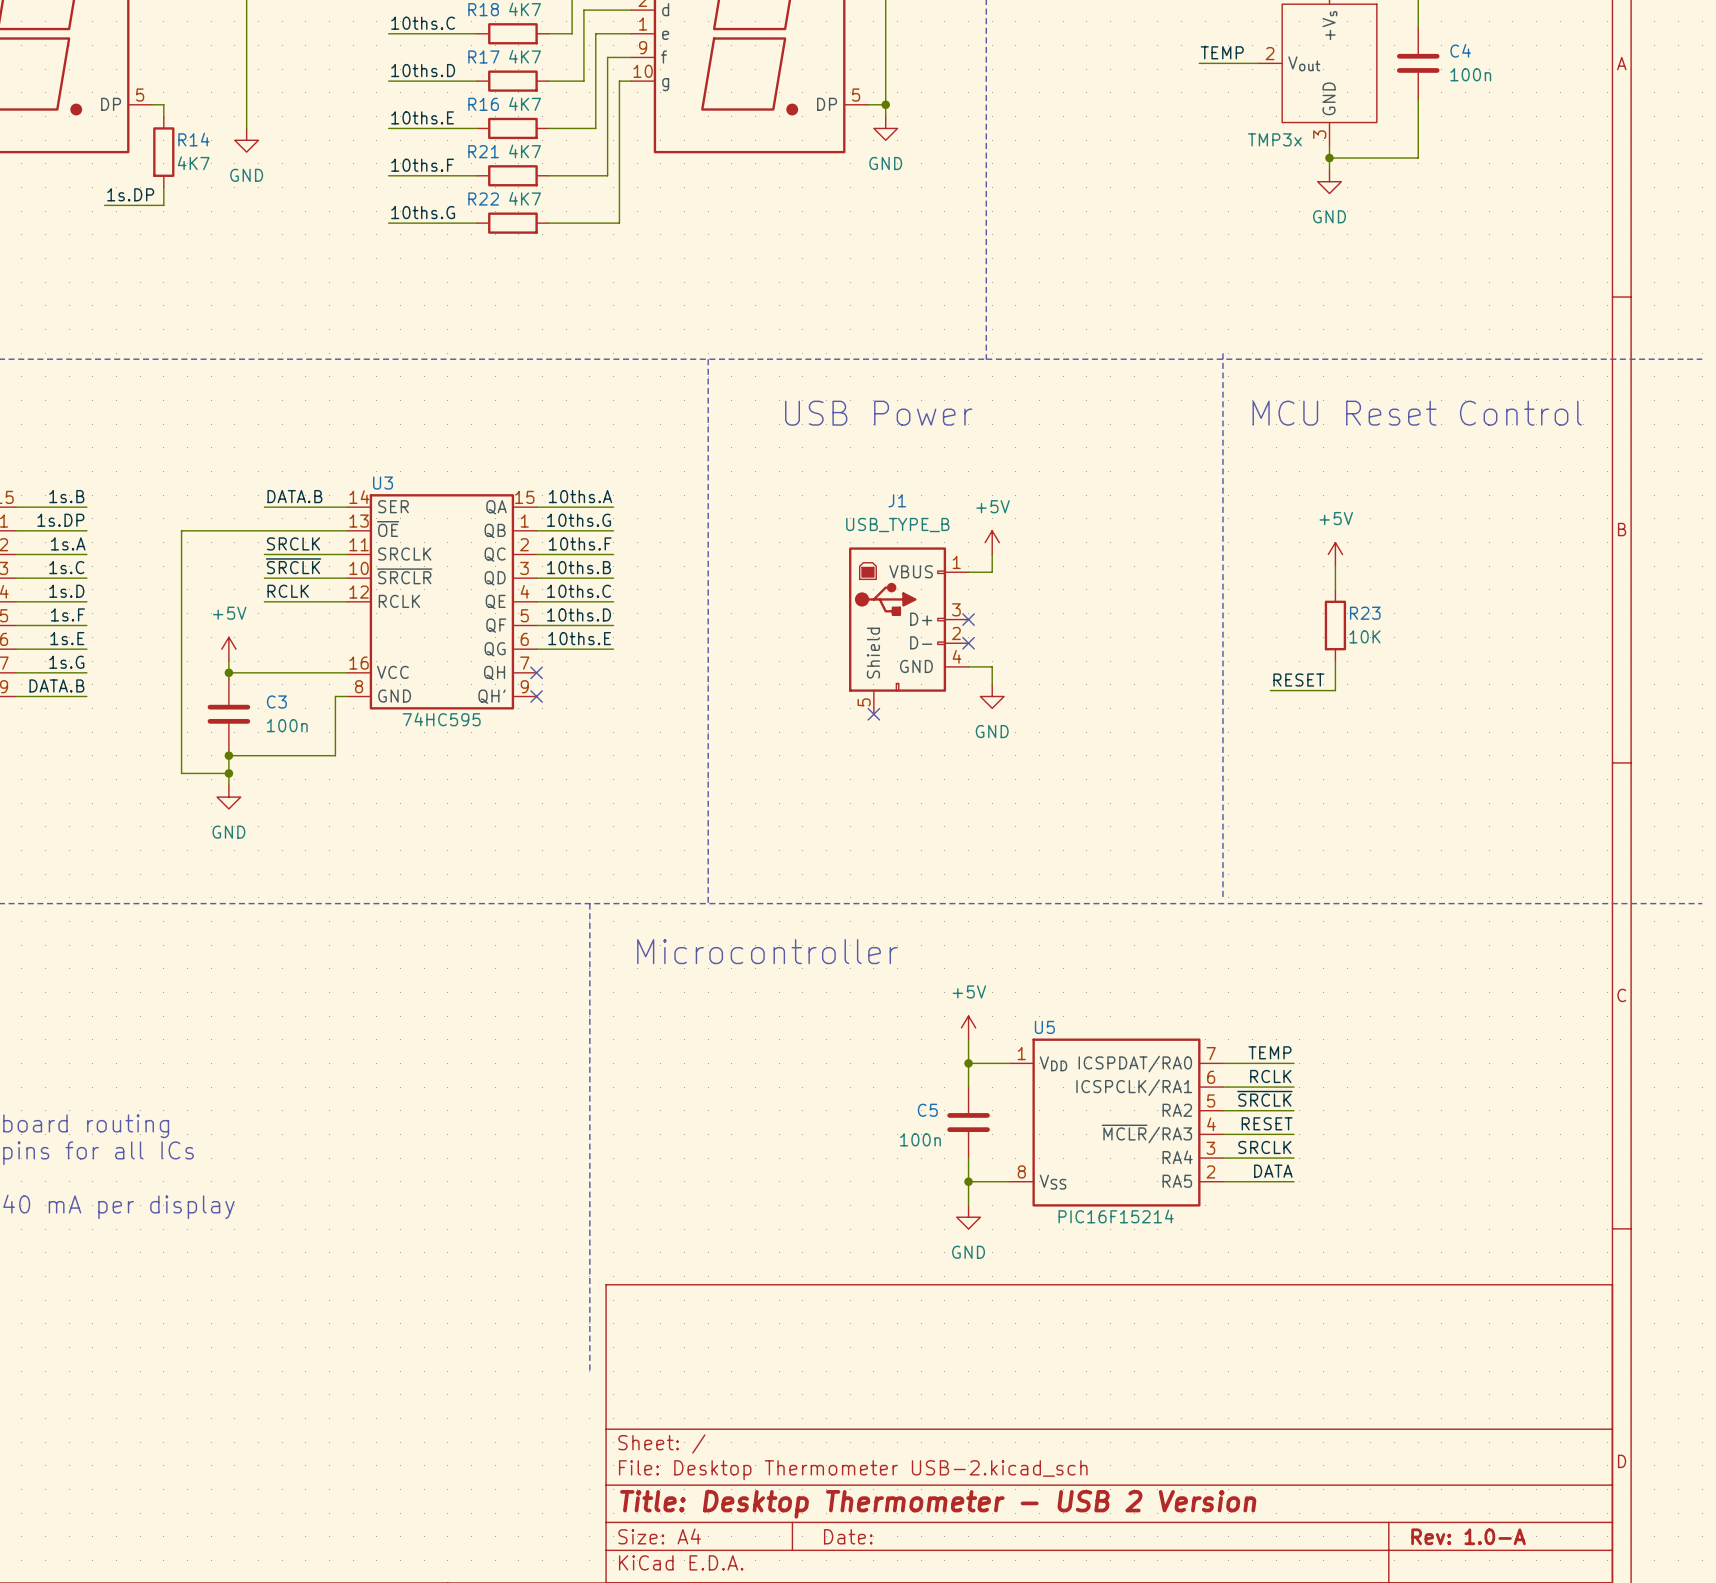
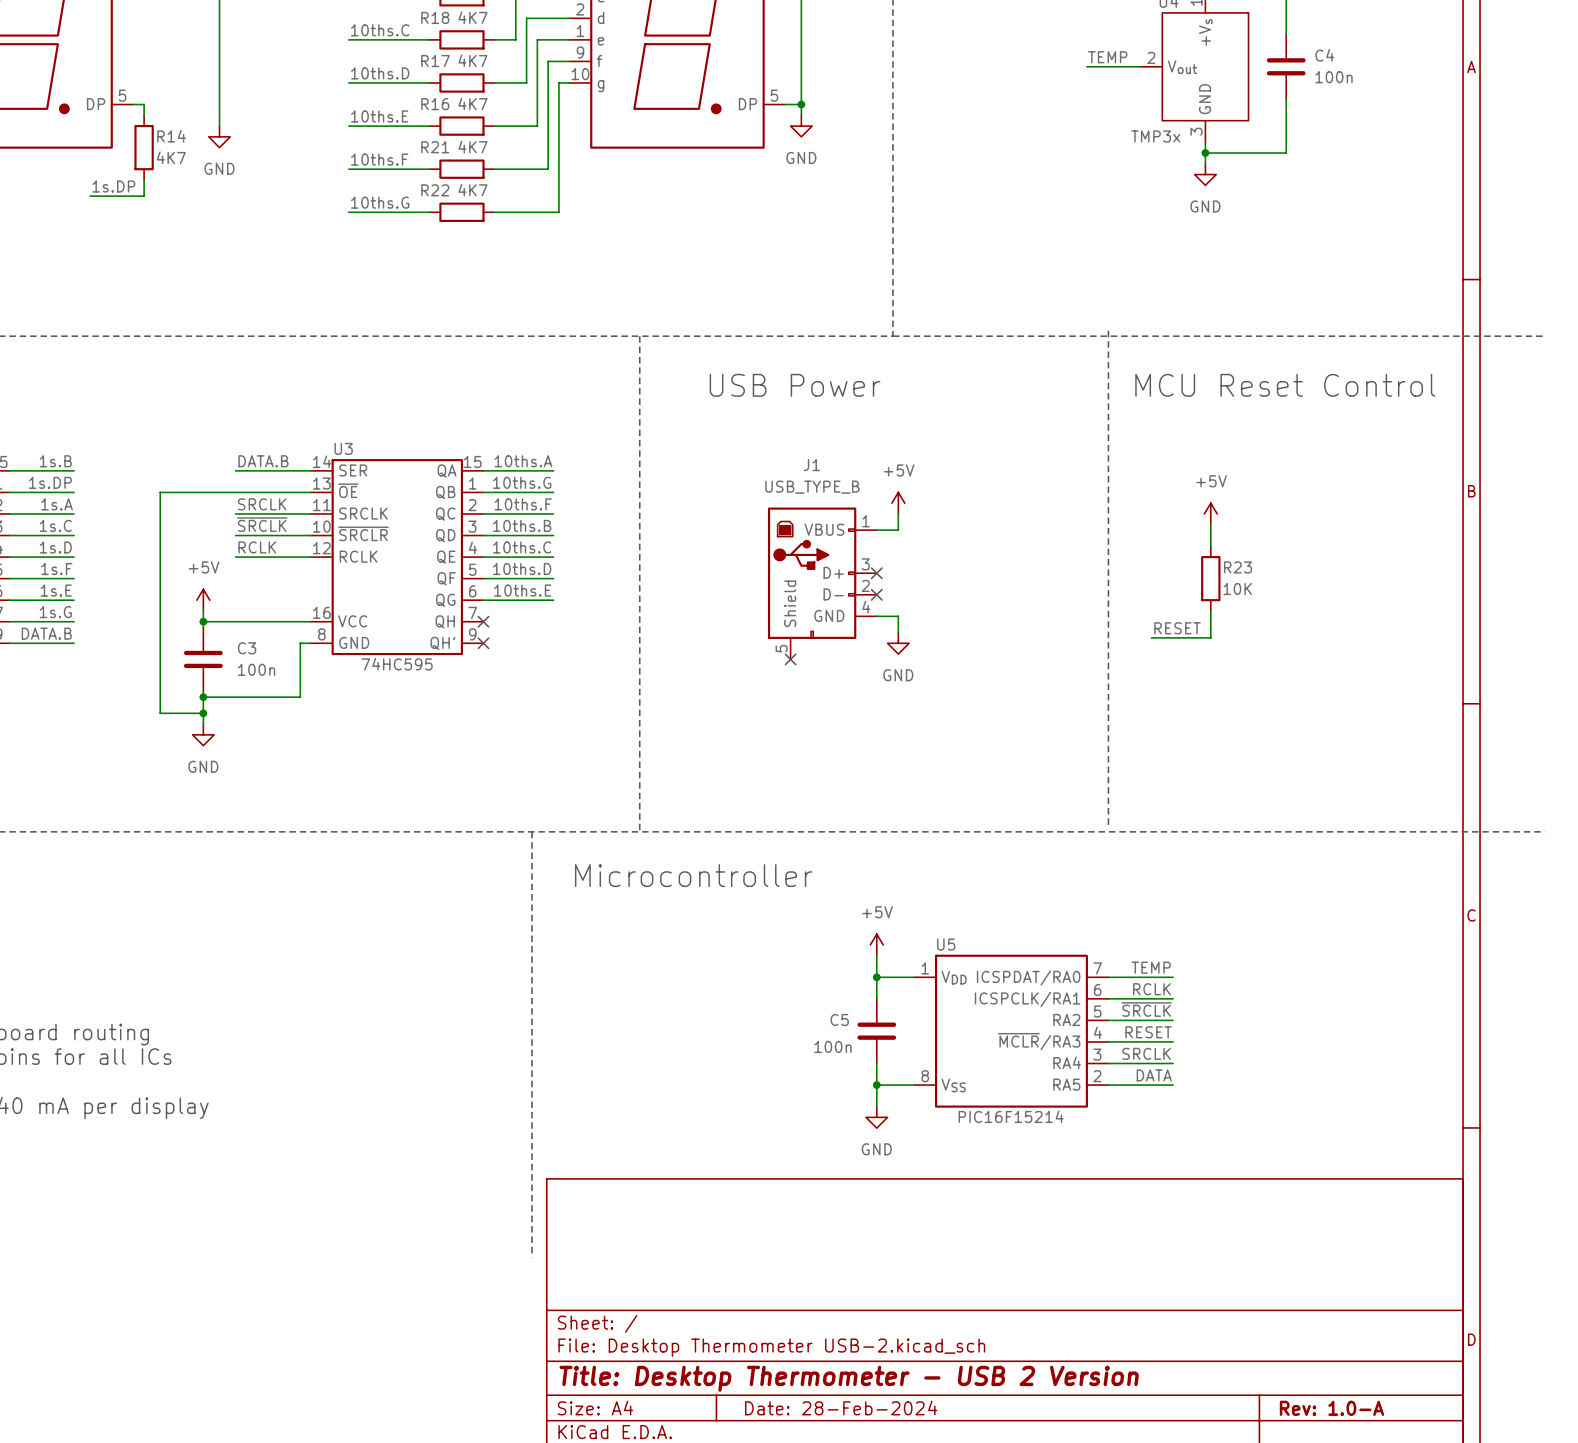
title block: Date: (848, 1536) -> Date: 28-Feb-2024 (841, 1408)

